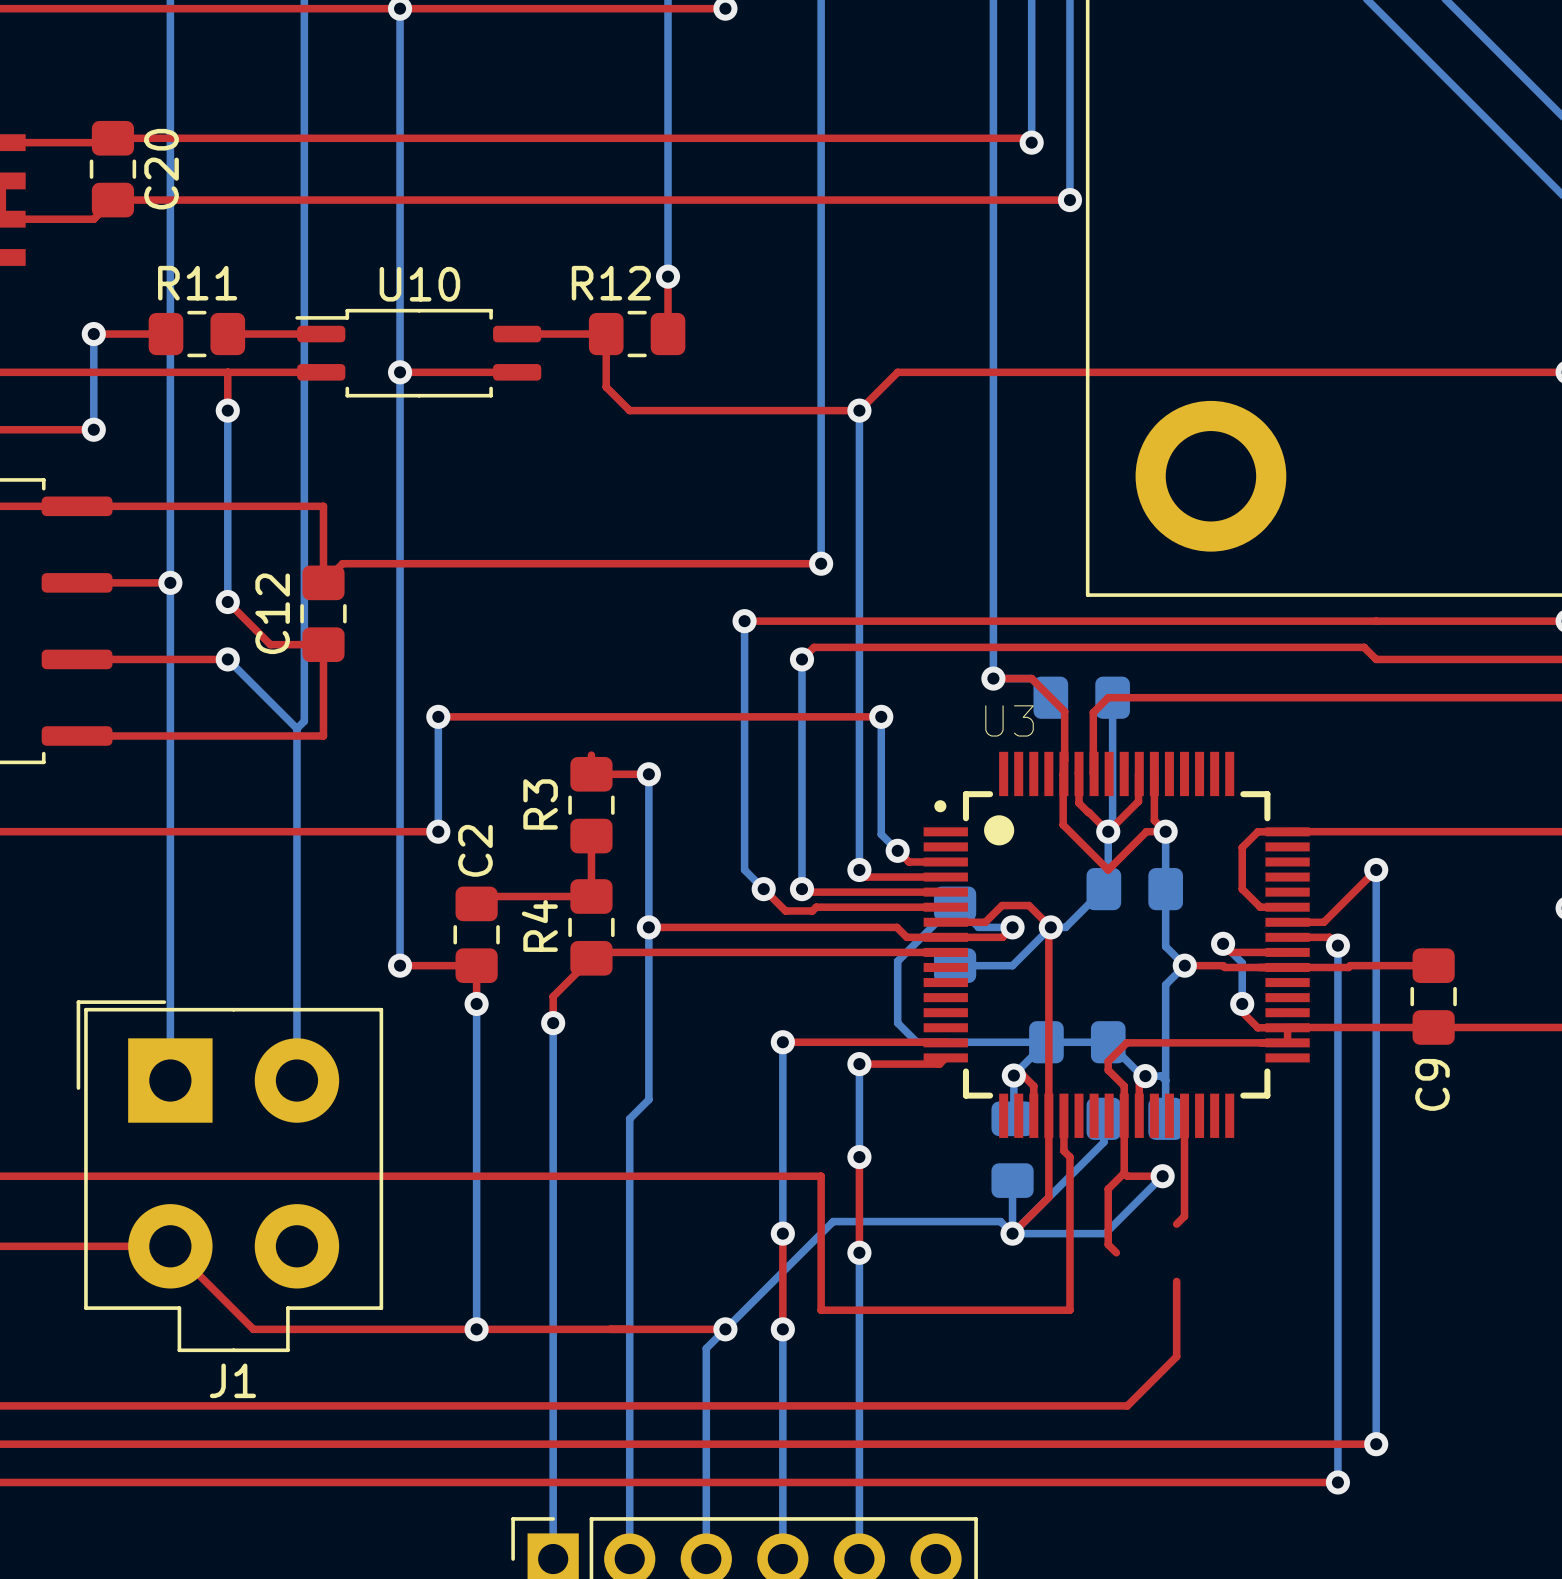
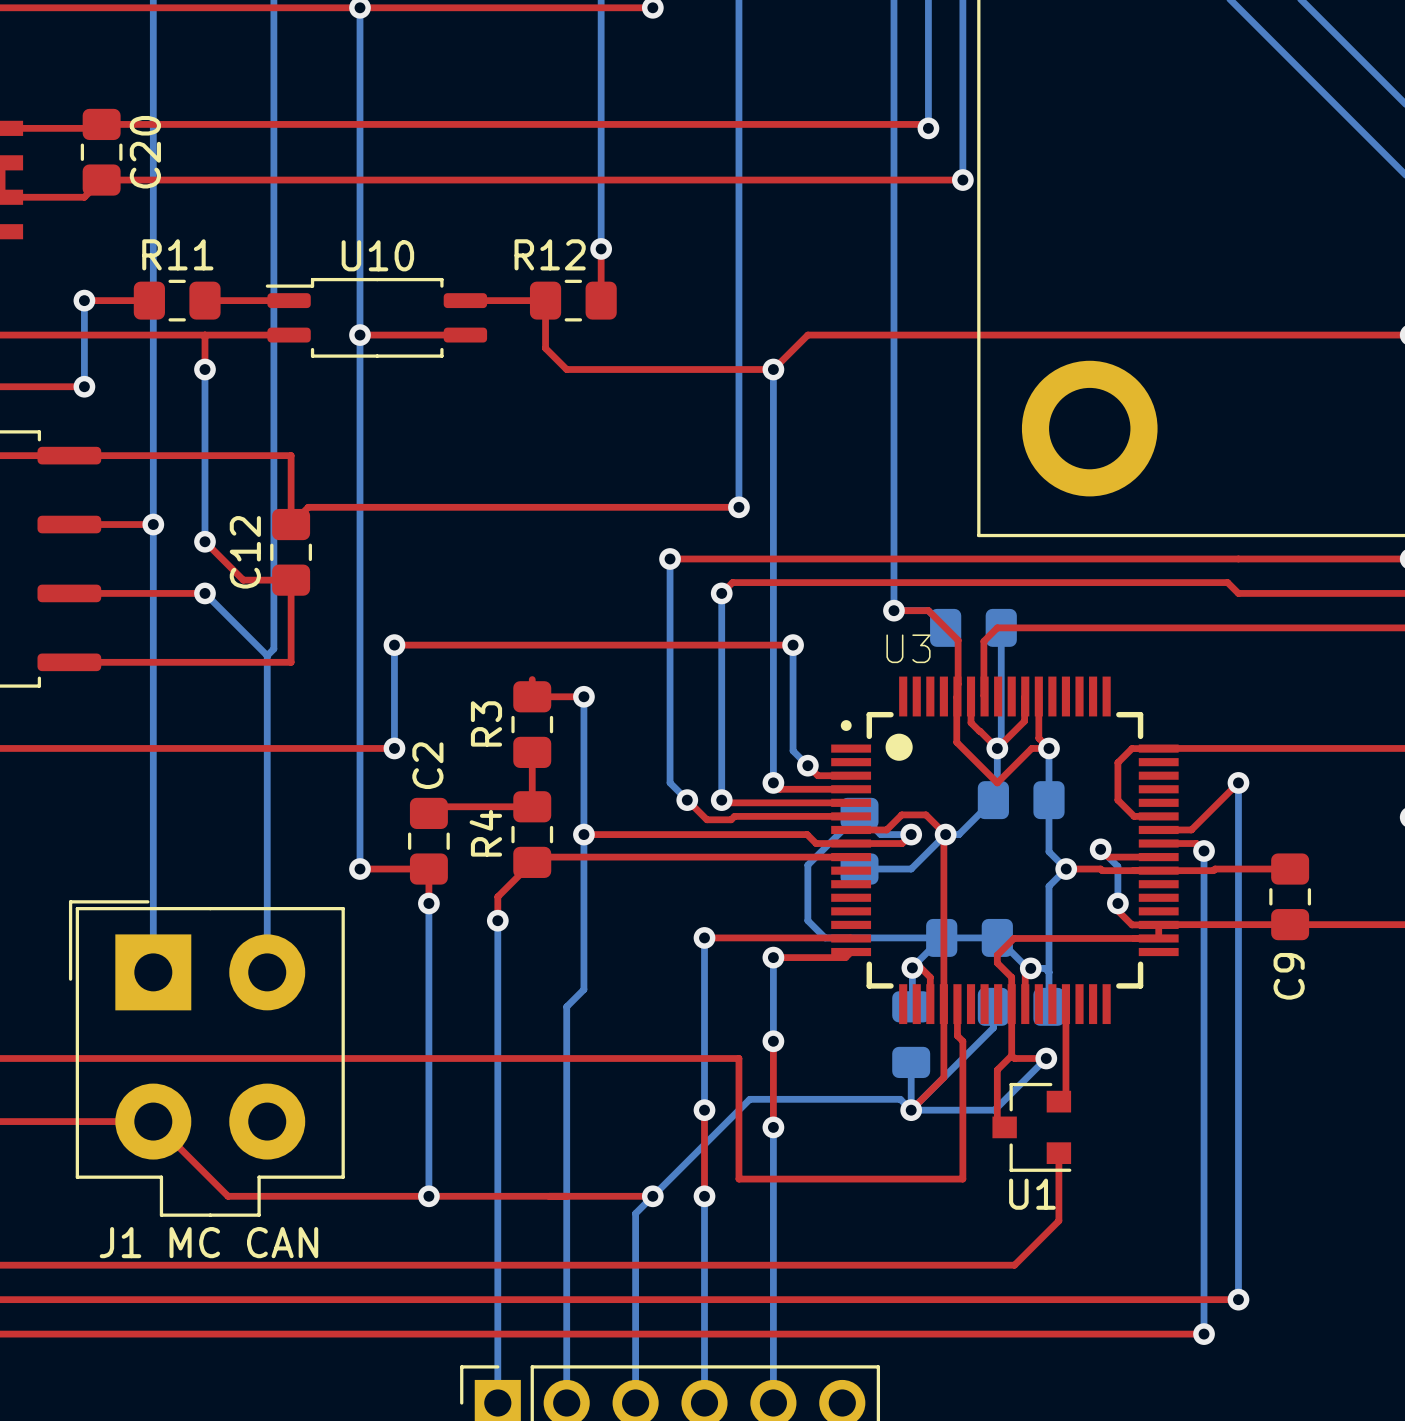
U1: none -> (1031, 1127)
J1 name: J1 (232, 1380) -> J1 MC CAN (208, 1242)

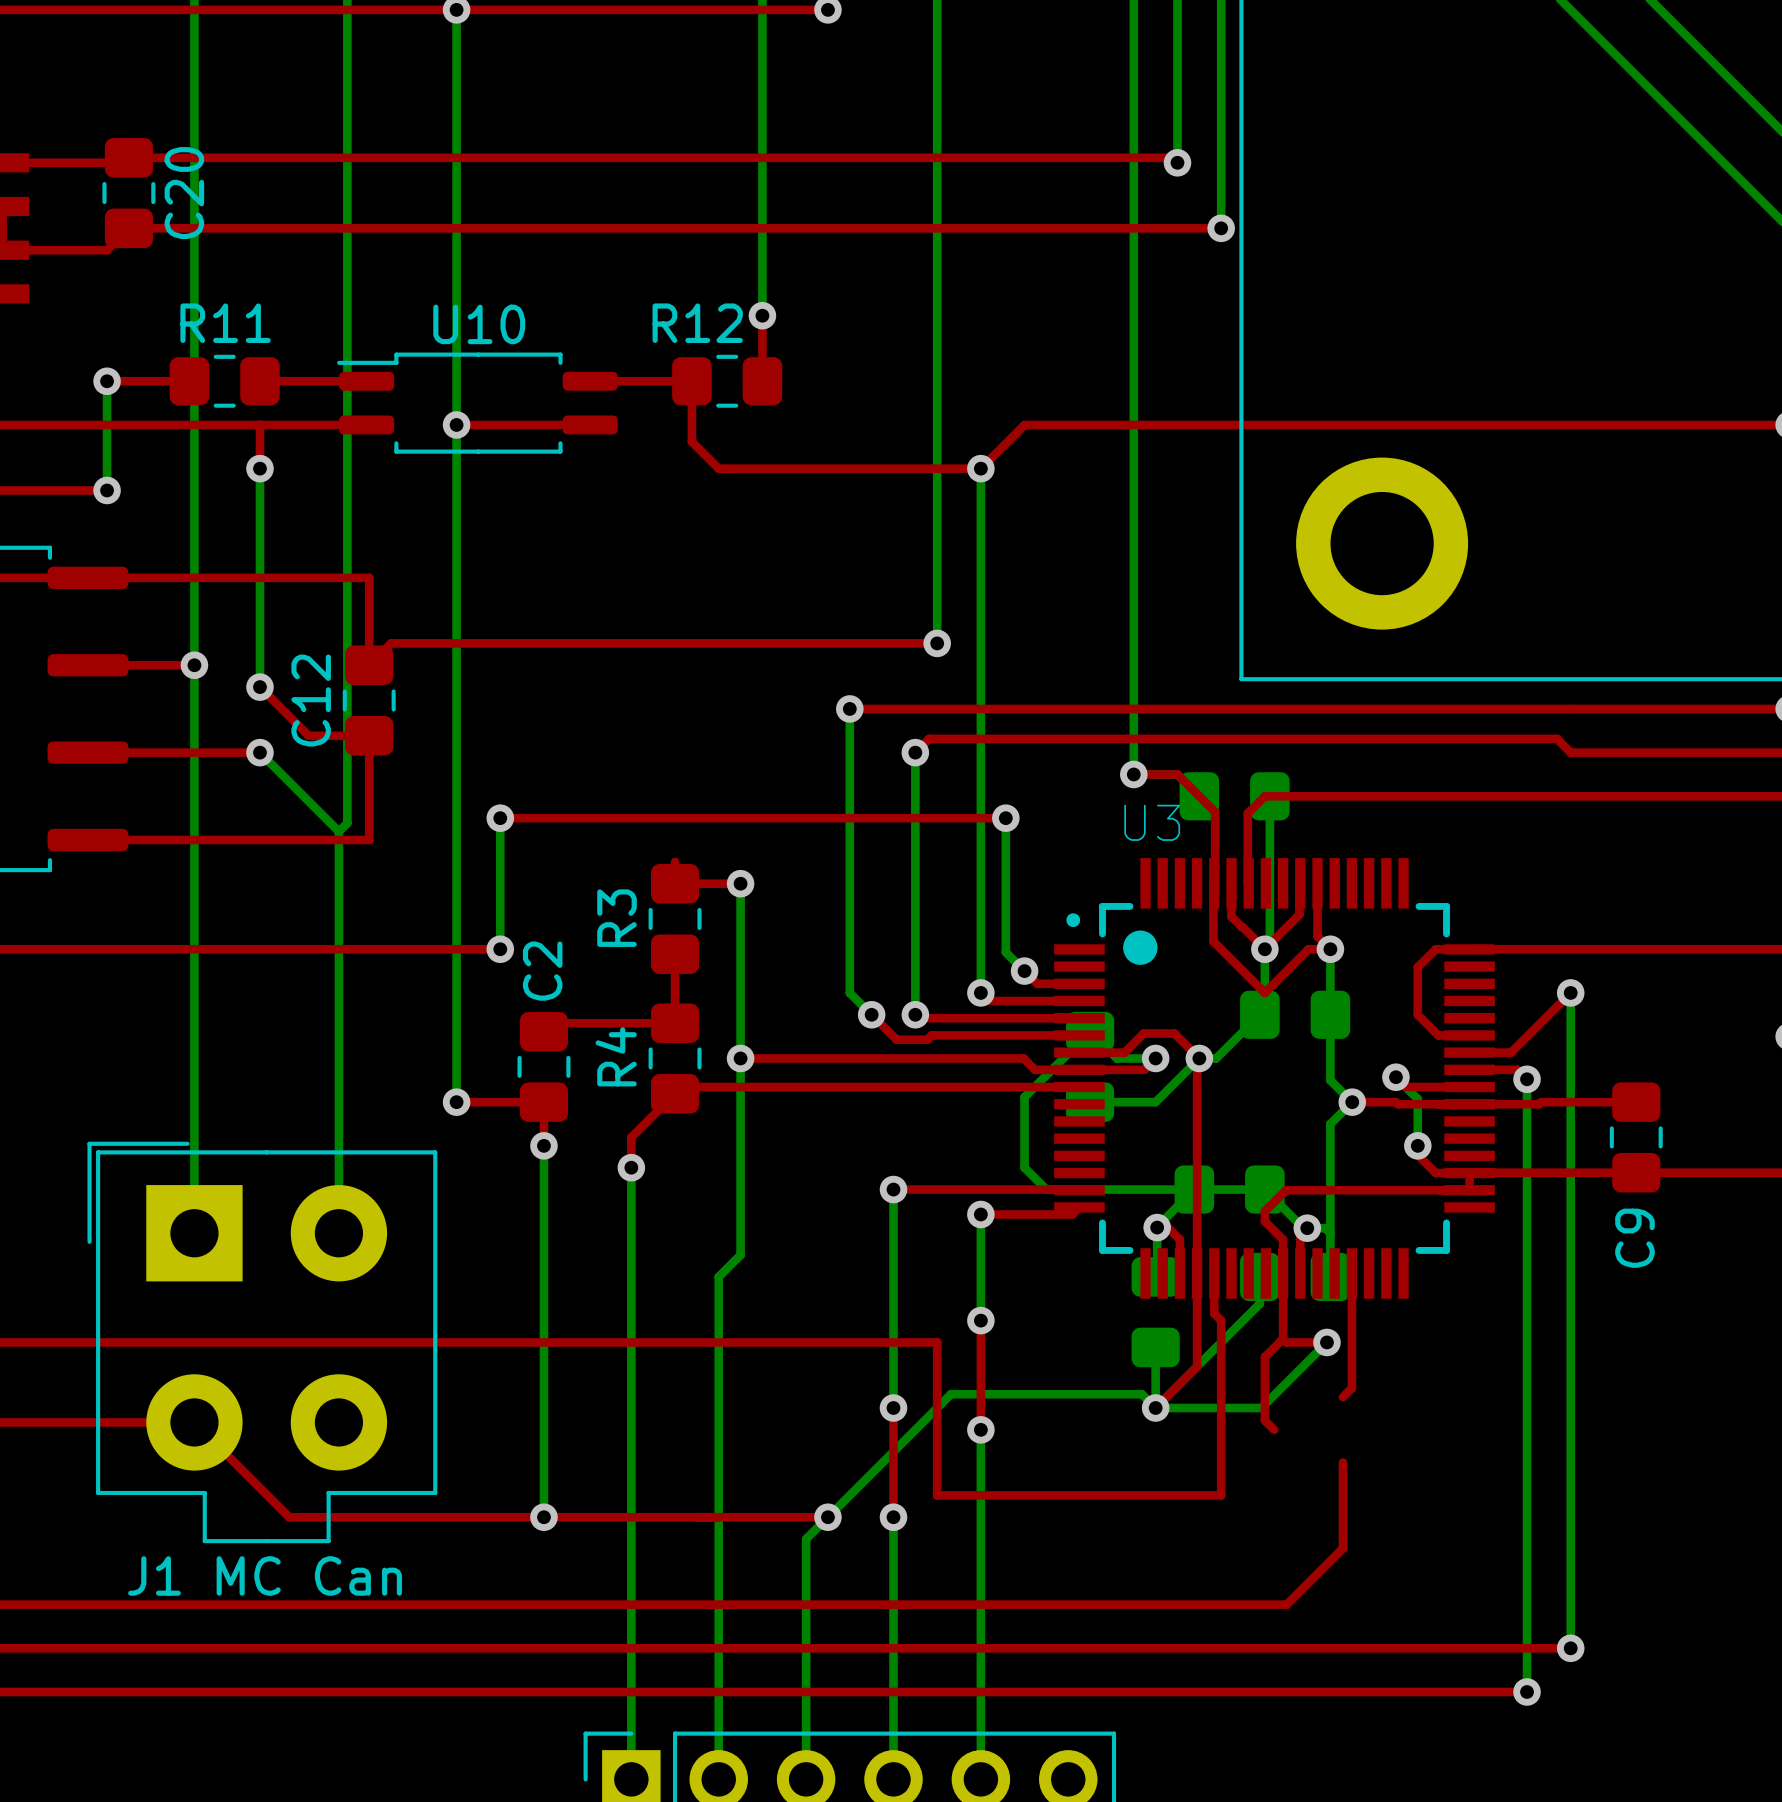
U1: (1031, 1127) -> none
J1 MC CAN name: J1 MC CAN (208, 1242) -> J1 MC Can (265, 1575)

